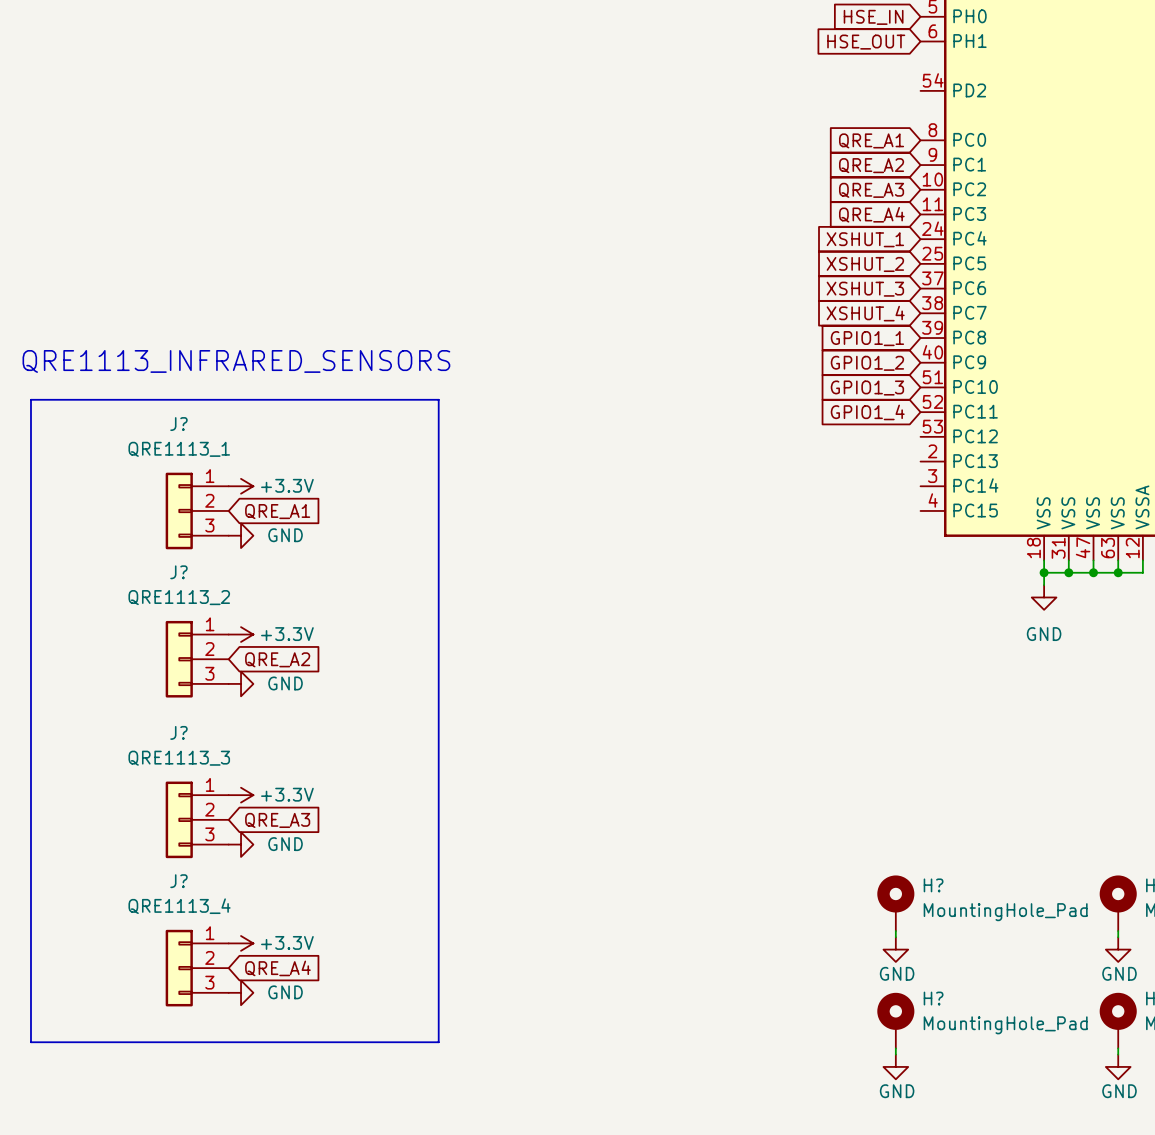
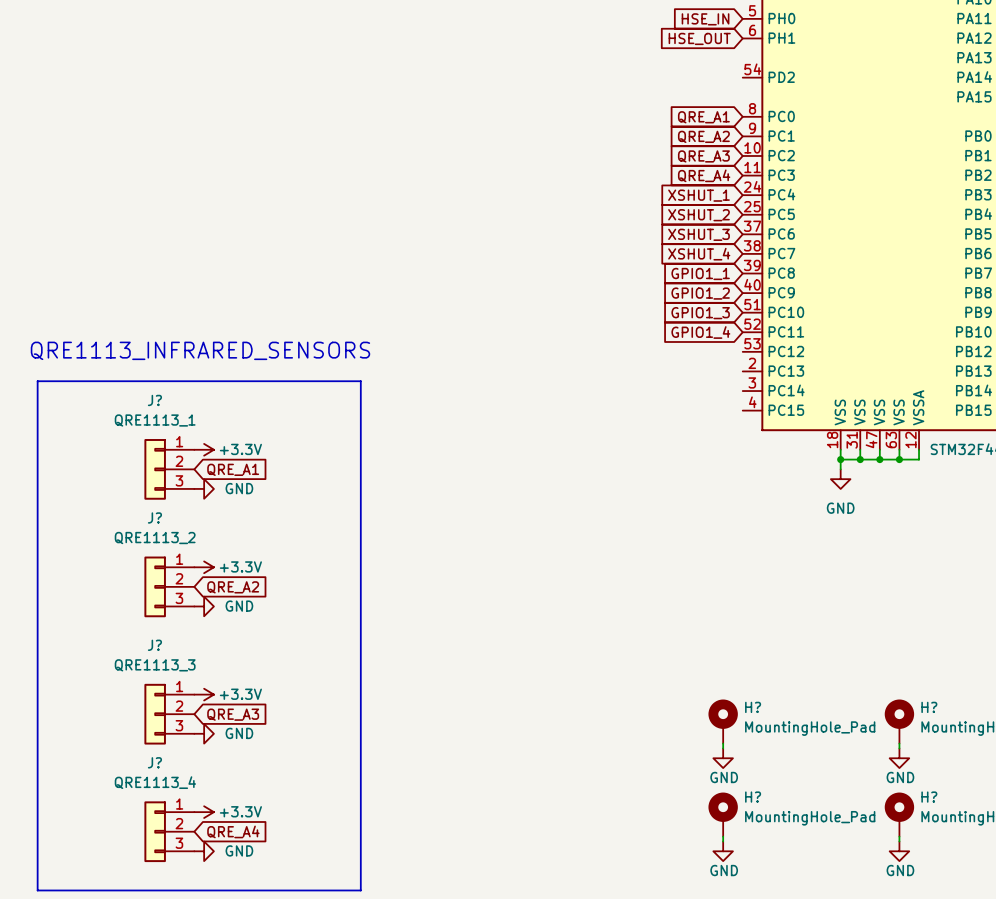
text position: QRE1113_INFRARED_SENSORS (236, 361) -> QRE1113_INFRARED_SENSORS (200, 350)
line: (30, 473) (30, 399) (438, 399) (438, 473) -> (37, 381) (360, 381)
power symbol: +3.3V (241, 486) -> none
J? position: (197, 510) -> (169, 469)
global label position: QRE_A1 (277, 511) -> QRE_A1 (233, 469)
power symbol: GND (241, 535) -> none
power symbol: none -> +3.3V (204, 449)
power symbol: none -> GND (204, 488)
power symbol: +3.3V (241, 634) -> none
J? position: (197, 659) -> (169, 586)
global label position: QRE_A2 (277, 659) -> QRE_A2 (233, 587)
power symbol: GND (241, 683) -> none
power symbol: none -> +3.3V (204, 567)
power symbol: none -> GND (204, 606)
power symbol: +3.3V (241, 795) -> none
J? position: (197, 819) -> (169, 714)
global label position: QRE_A3 (277, 820) -> QRE_A3 (233, 714)
power symbol: GND (241, 844) -> none
power symbol: none -> +3.3V (204, 694)
power symbol: none -> GND (204, 733)
power symbol: +3.3V (241, 943) -> none
J? position: (197, 968) -> (169, 831)
global label position: QRE_A4 (277, 968) -> QRE_A4 (233, 831)
power symbol: GND (241, 992) -> none
power symbol: none -> +3.3V (204, 812)
line: (30, 1042) (438, 1042) -> (37, 831) (37, 890) (360, 890) (360, 831)
power symbol: none -> GND (204, 851)

